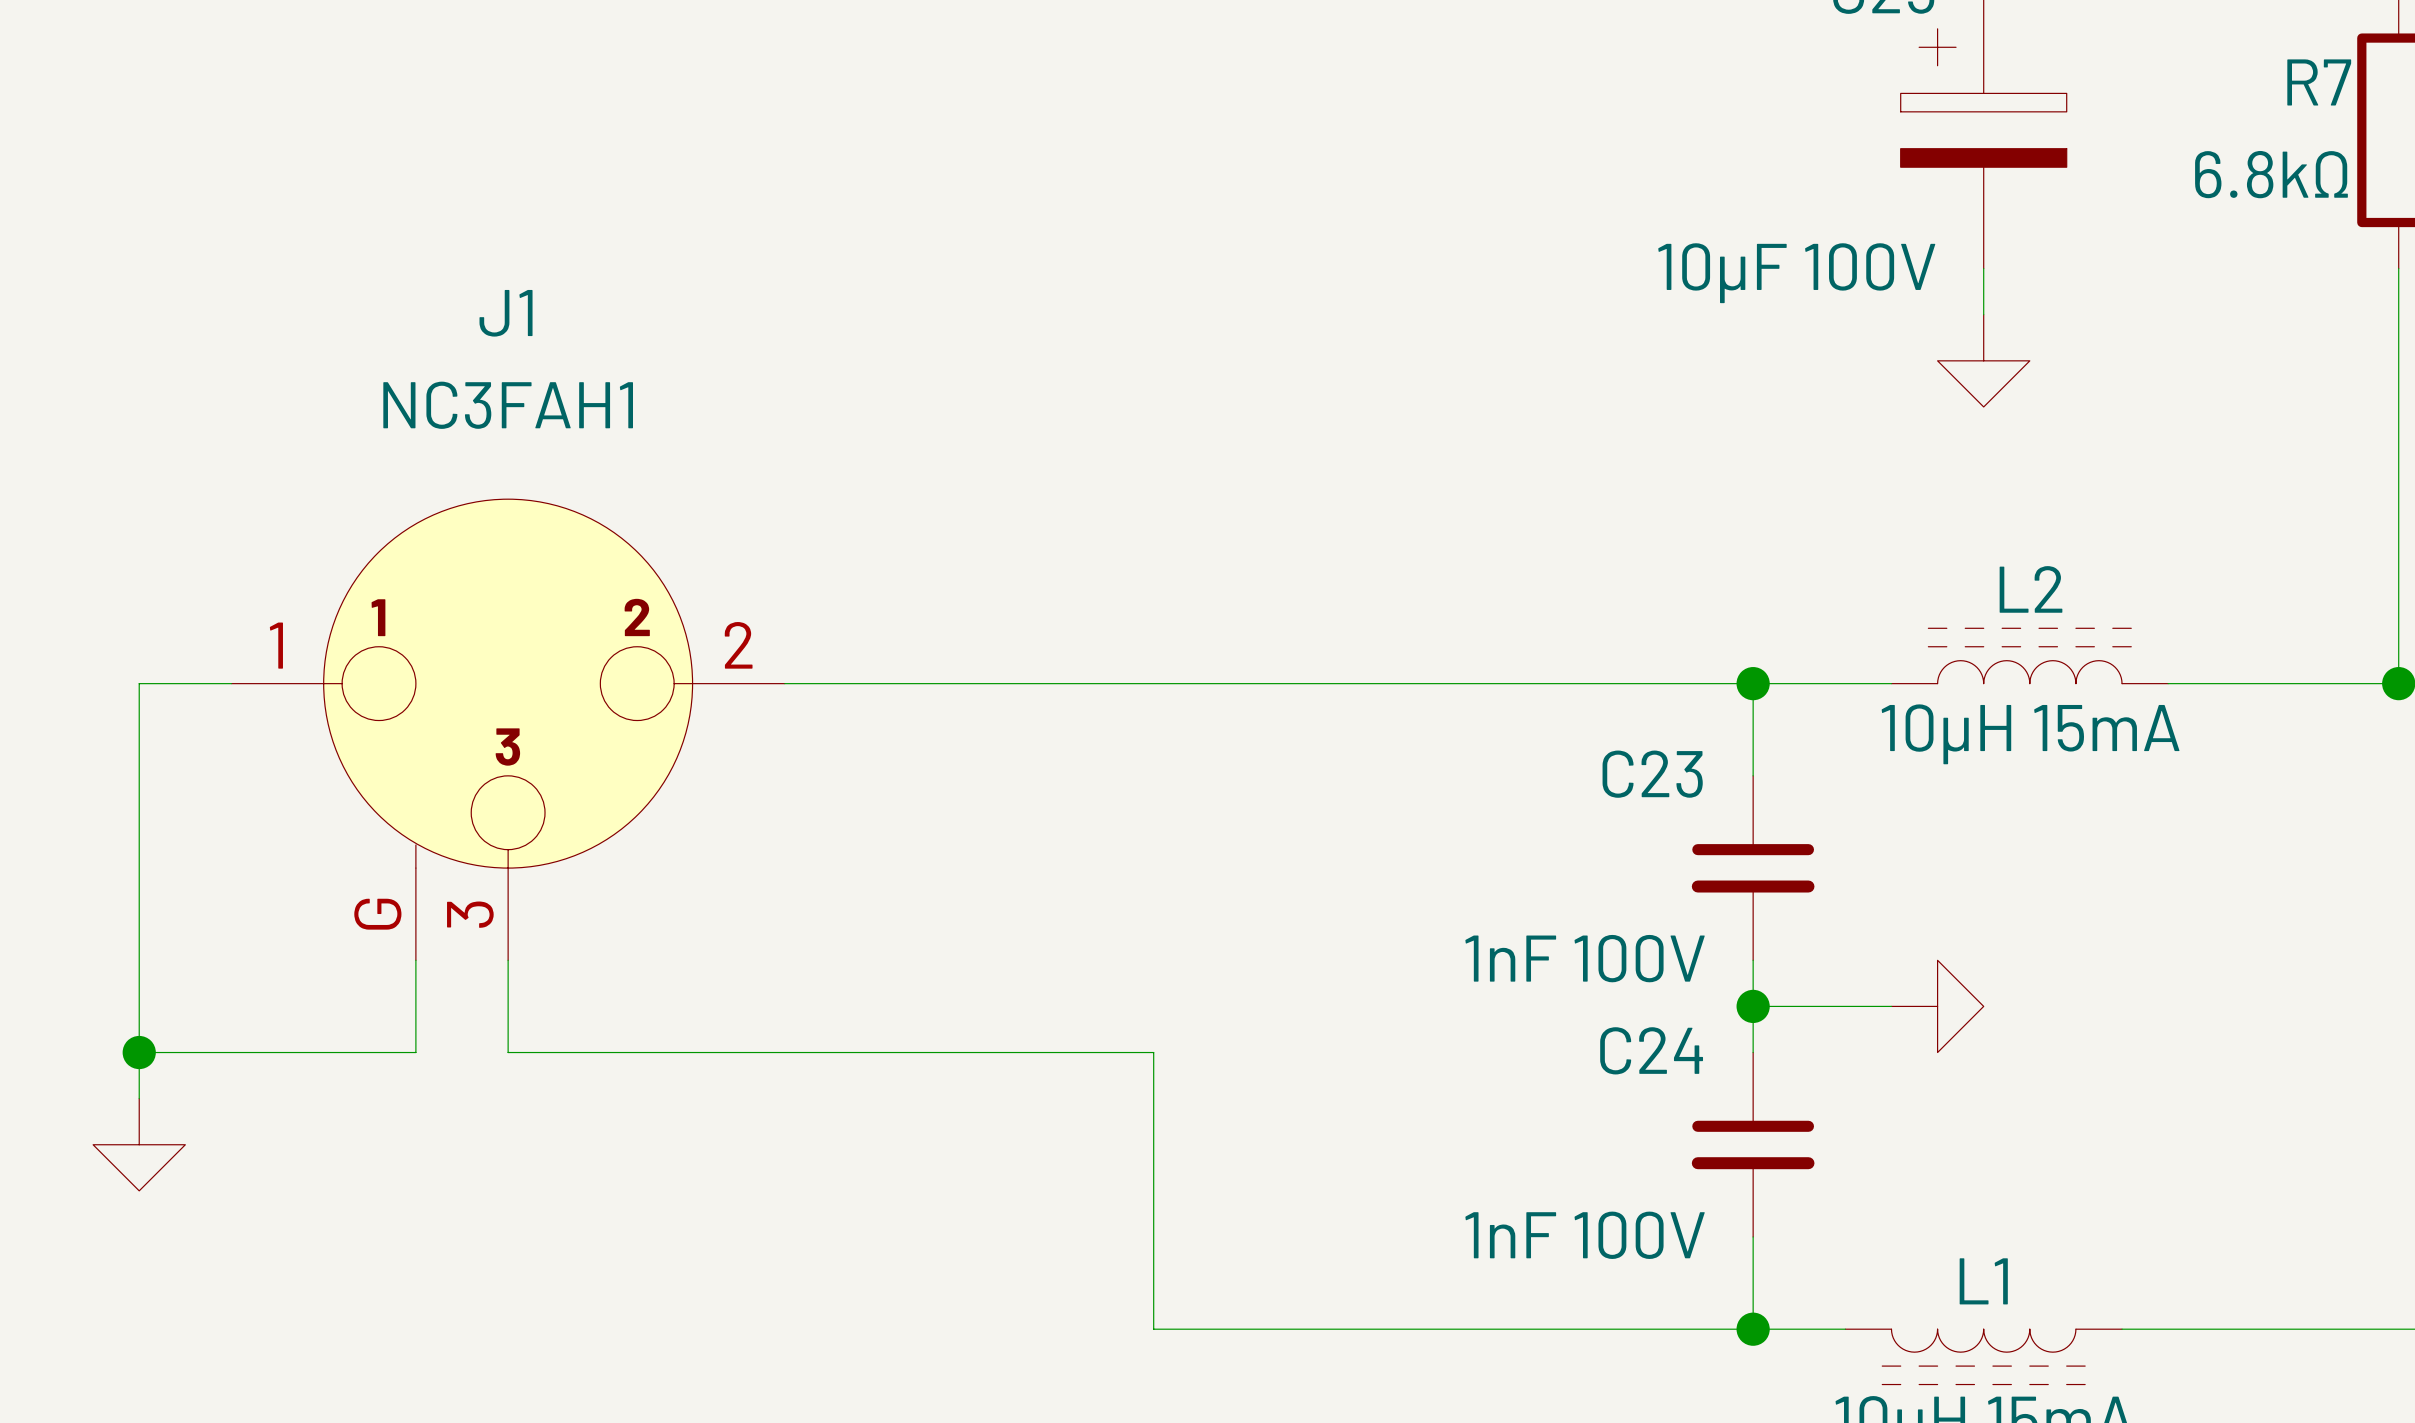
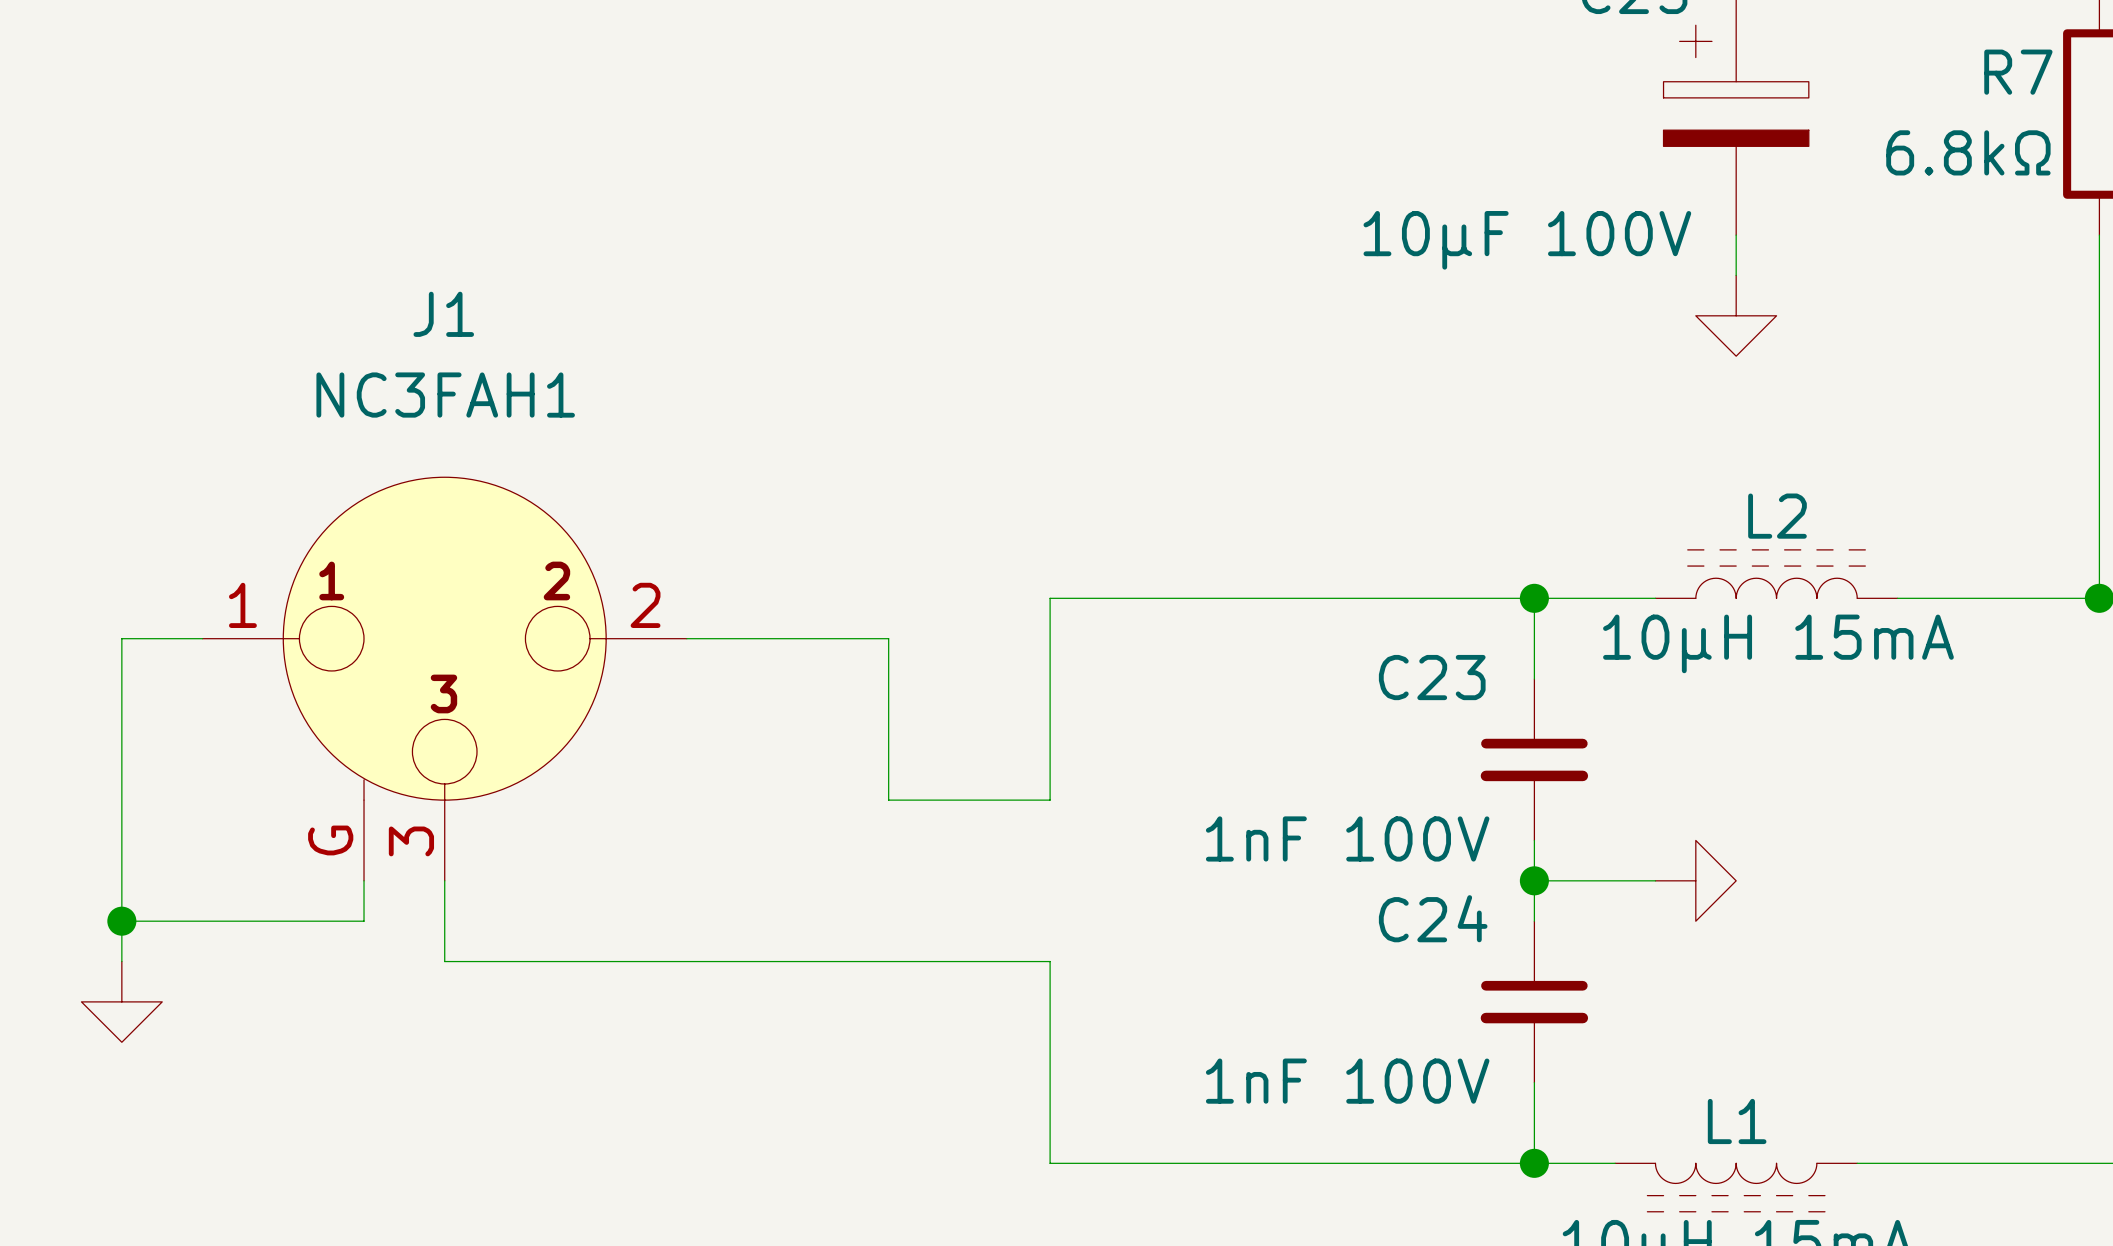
wire: (231, 683) (139, 683) (139, 729) -> (202, 638) (121, 638)
wire: (784, 683) (1199, 683) -> (686, 638) (888, 638) (888, 800) (1050, 800) (1050, 598)
J1 position: (508, 729) -> (444, 679)
wire: (508, 1052) (1153, 1052) (1153, 1329) (1199, 1329) -> (444, 921) (444, 961) (1050, 961) (1050, 1163)

